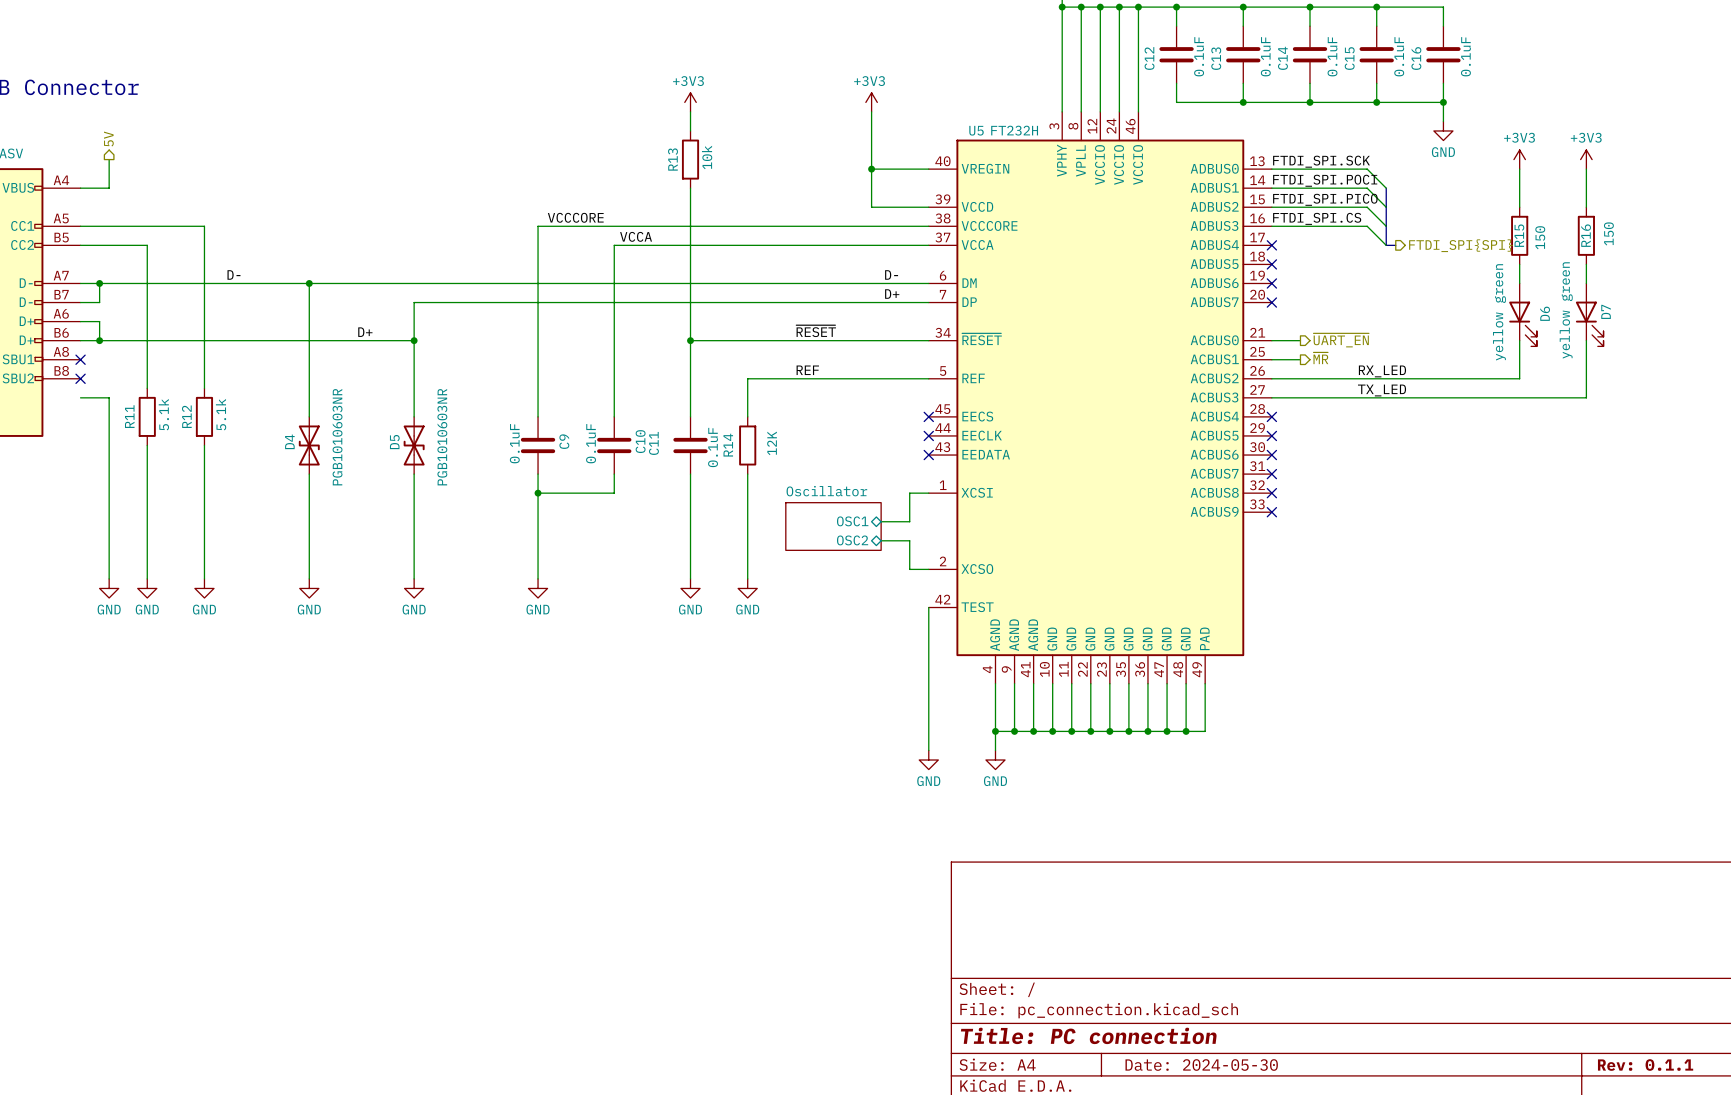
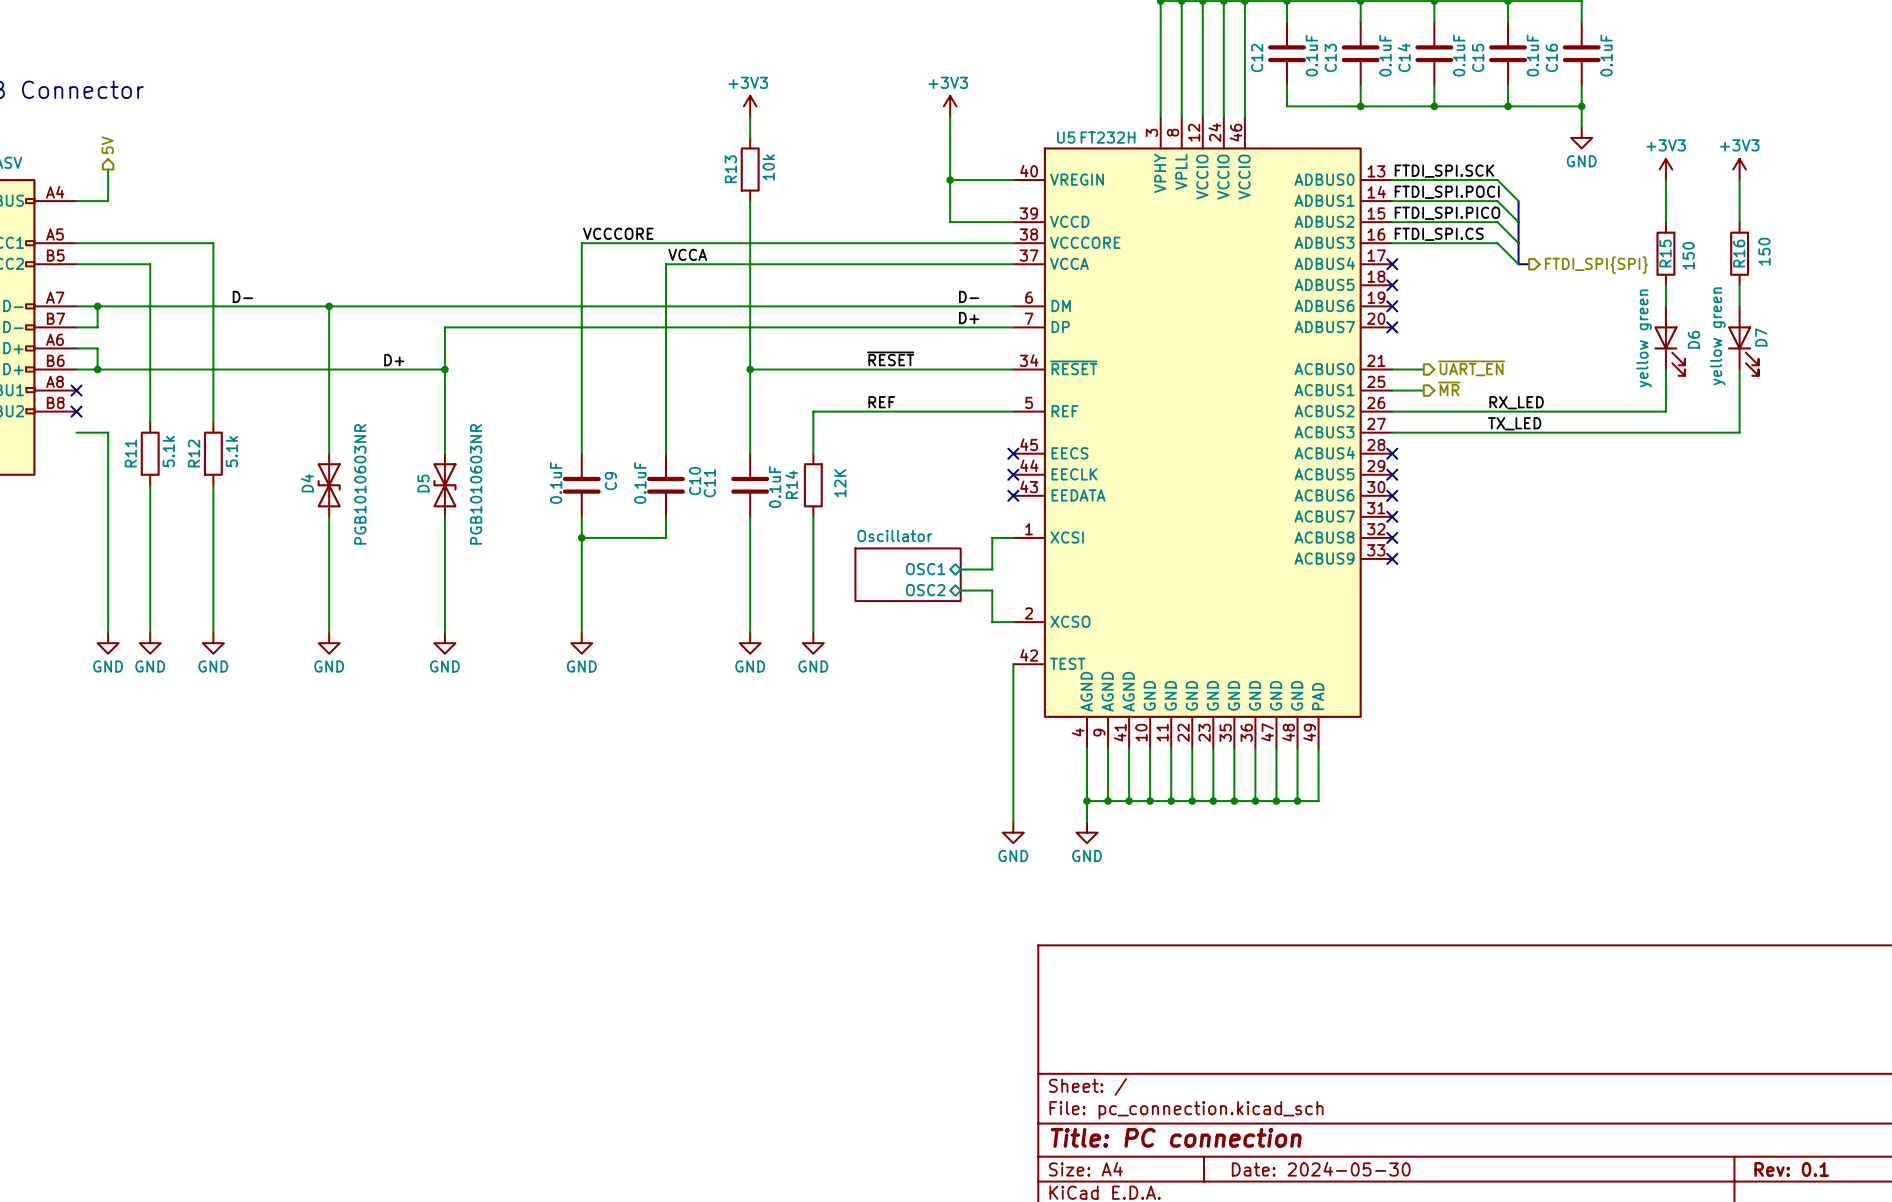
title block: Rev: 0.1.1 (1645, 1065) -> Rev: 0.1 (1791, 1169)

